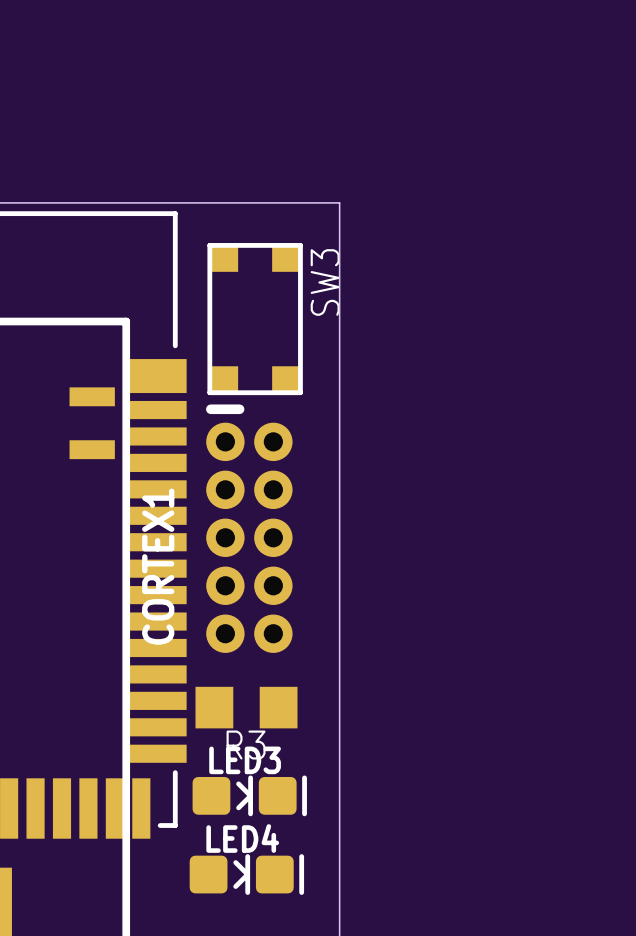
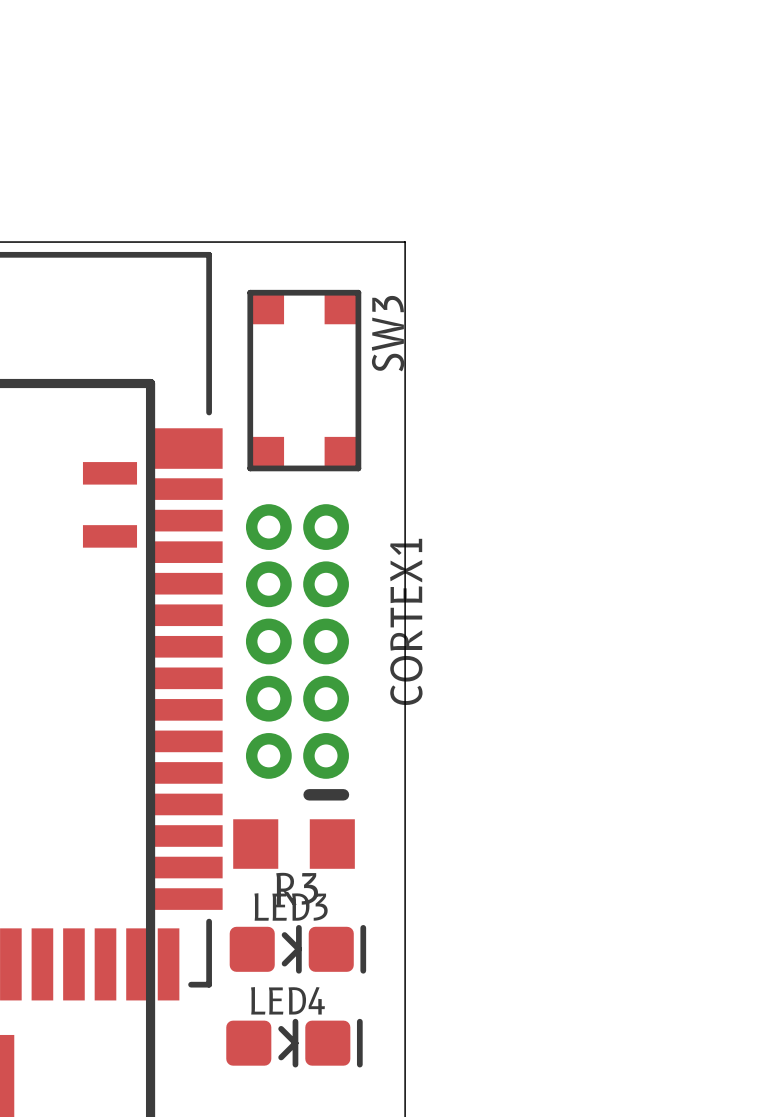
CORTEX1 rotation: 0° (249, 528) -> 180° (297, 652)

